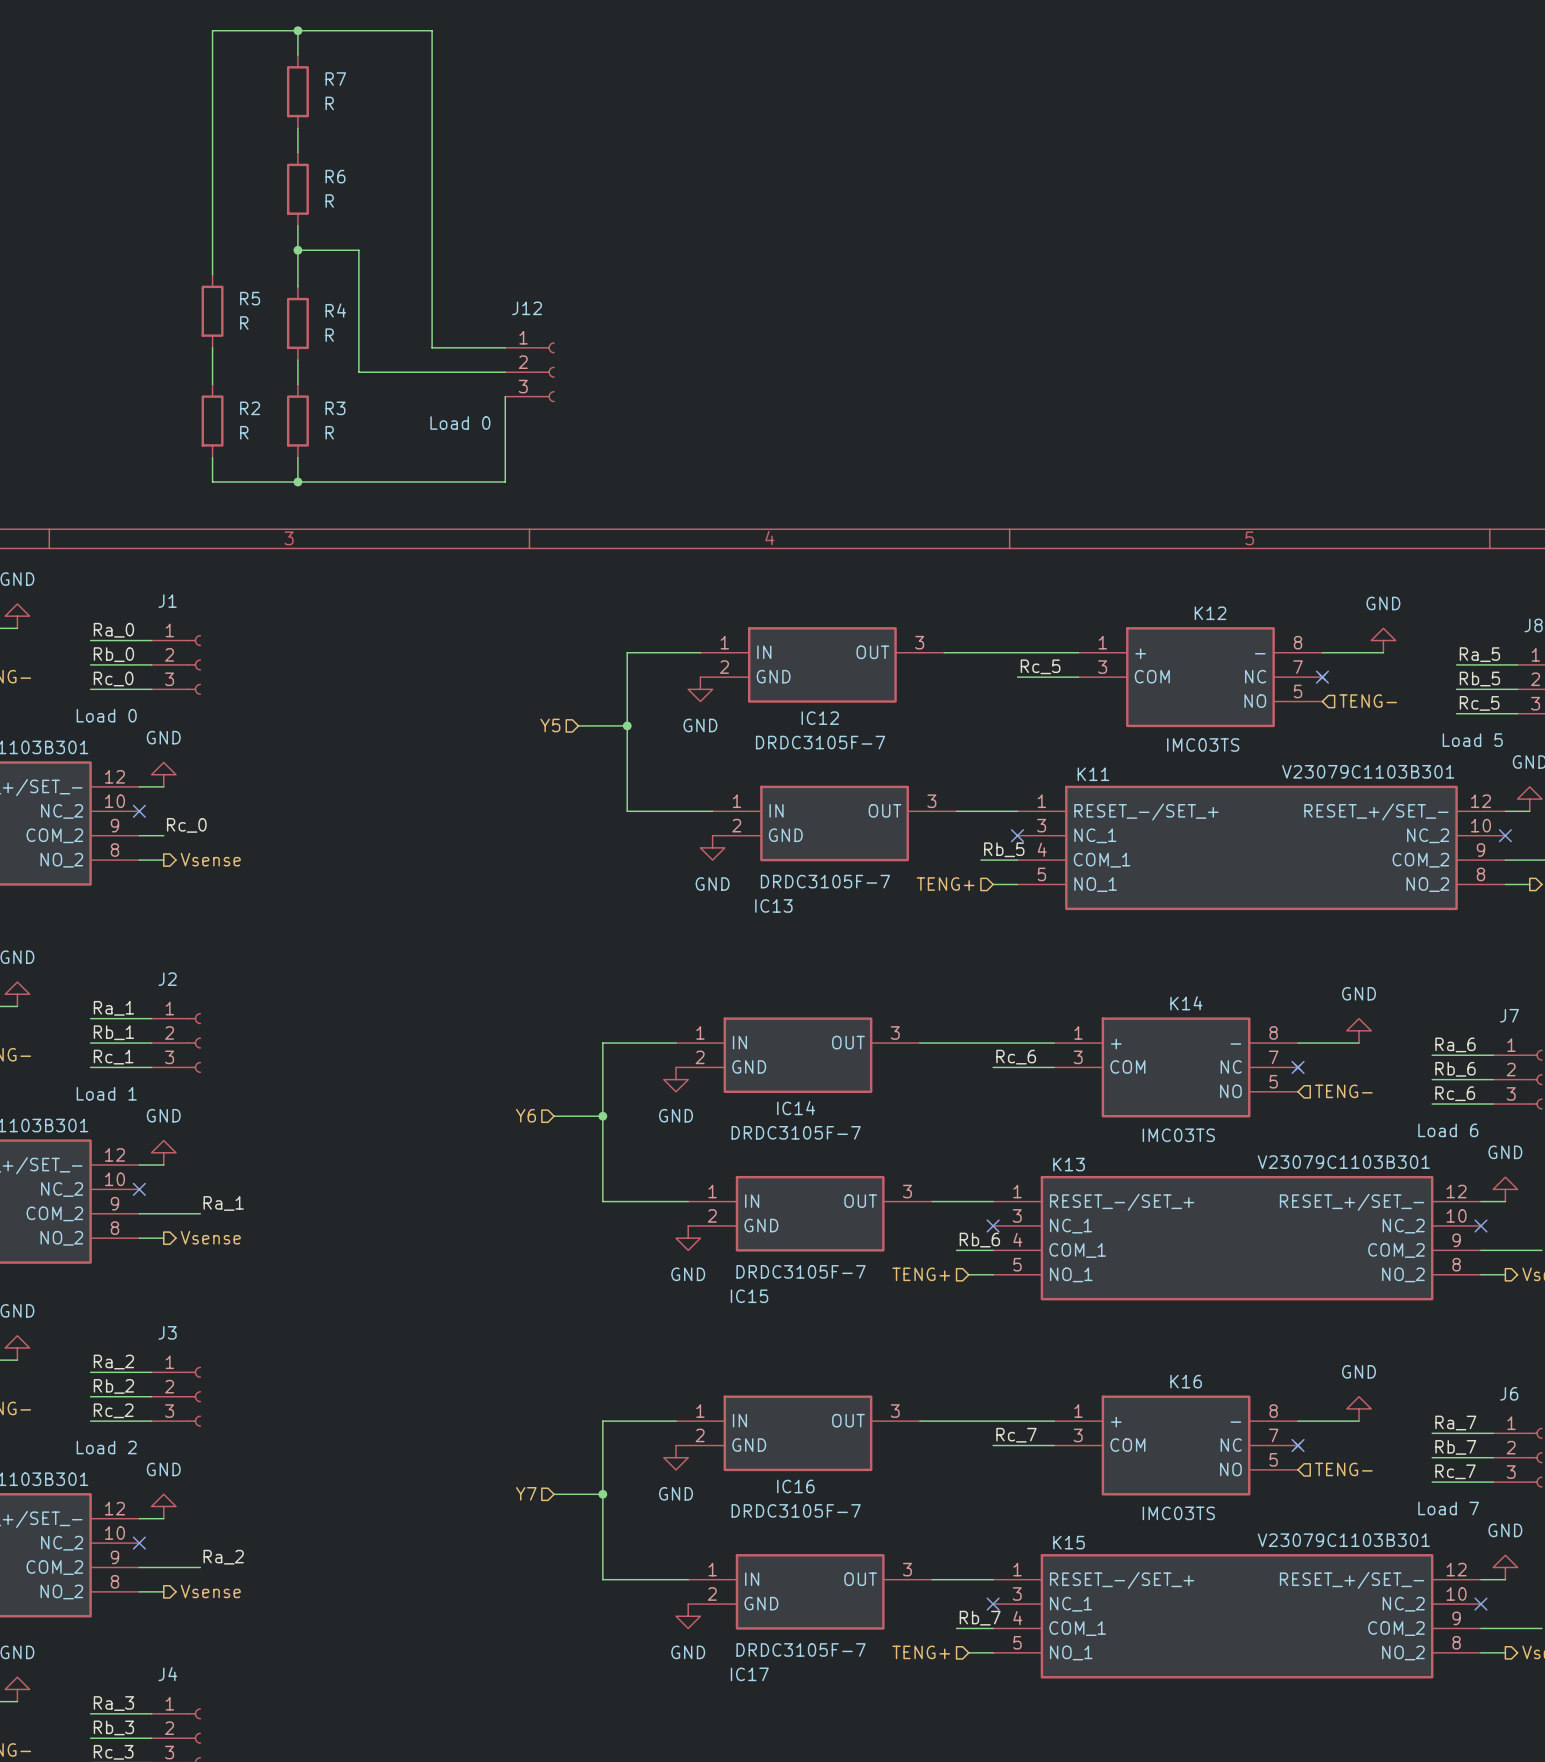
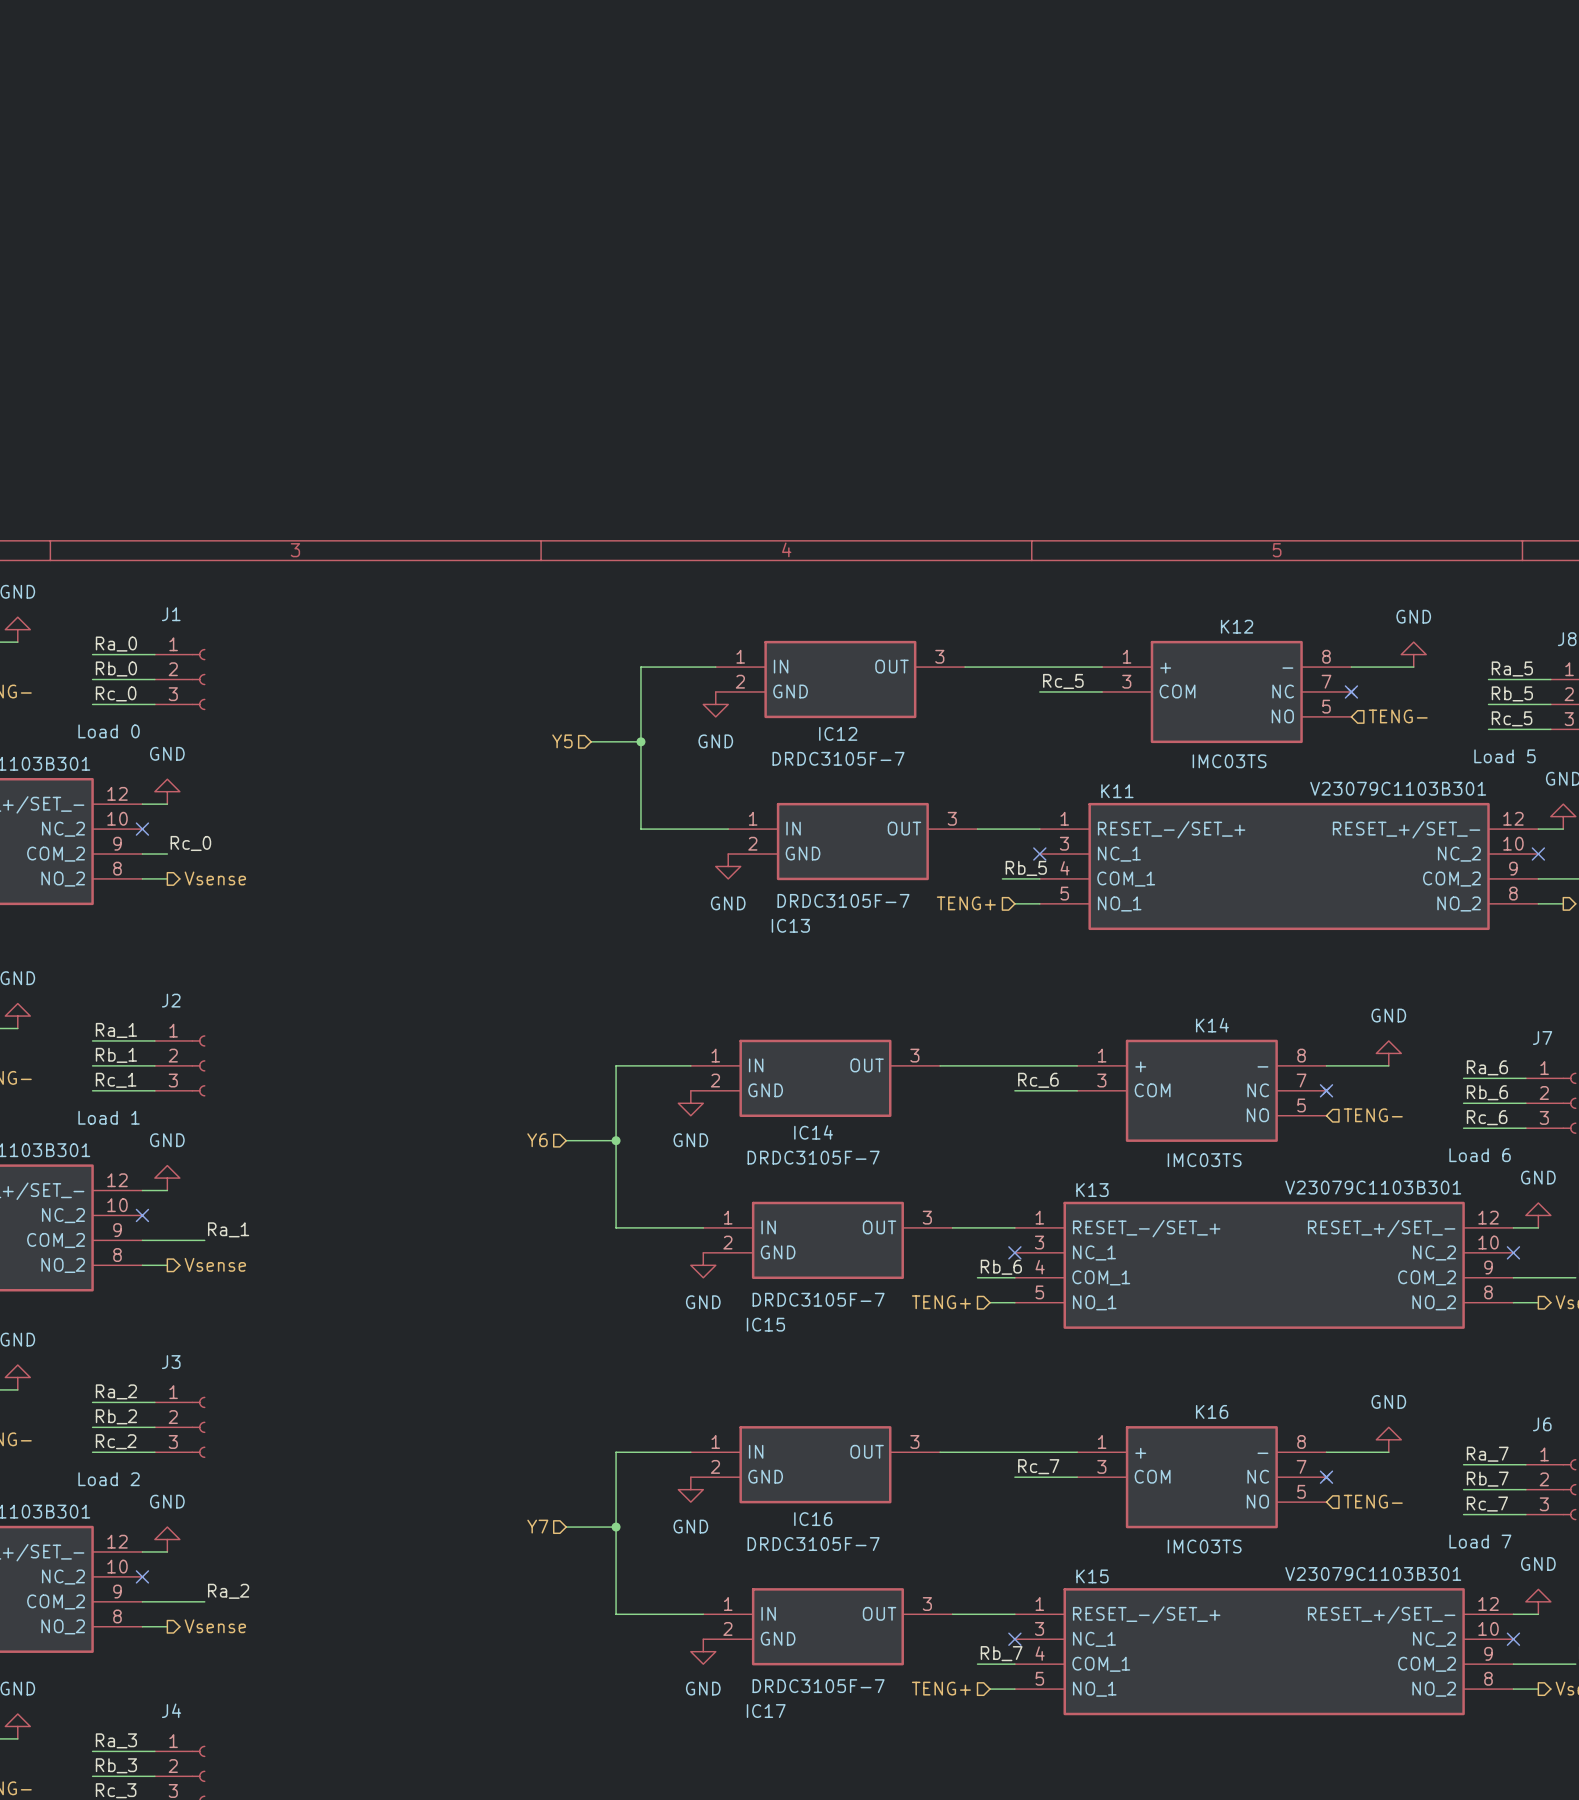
wire: (297, 30) (297, 55) -> none
junction: (297, 30) -> none
R7: R (297, 91) -> none
wire: (297, 128) (297, 152) -> none
R6: R (297, 189) -> none
wire: (297, 225) (297, 286) -> none
wire: (297, 250) (358, 250) (358, 372) (505, 372) -> none
junction: (297, 250) -> none
wire: (212, 274) (212, 30) (432, 30) (432, 347) (505, 347) -> none
R5: R (212, 311) -> none
R4: R (297, 323) -> none
wire: (212, 347) (212, 384) -> none
wire: (297, 360) (297, 384) -> none
J12: Load 0 (530, 372) -> none
wire: (505, 396) (505, 482) (212, 482) (212, 457) -> none
R2: R (212, 421) -> none
R3: R (297, 421) -> none
wire: (297, 457) (297, 482) -> none
junction: (297, 482) -> none

